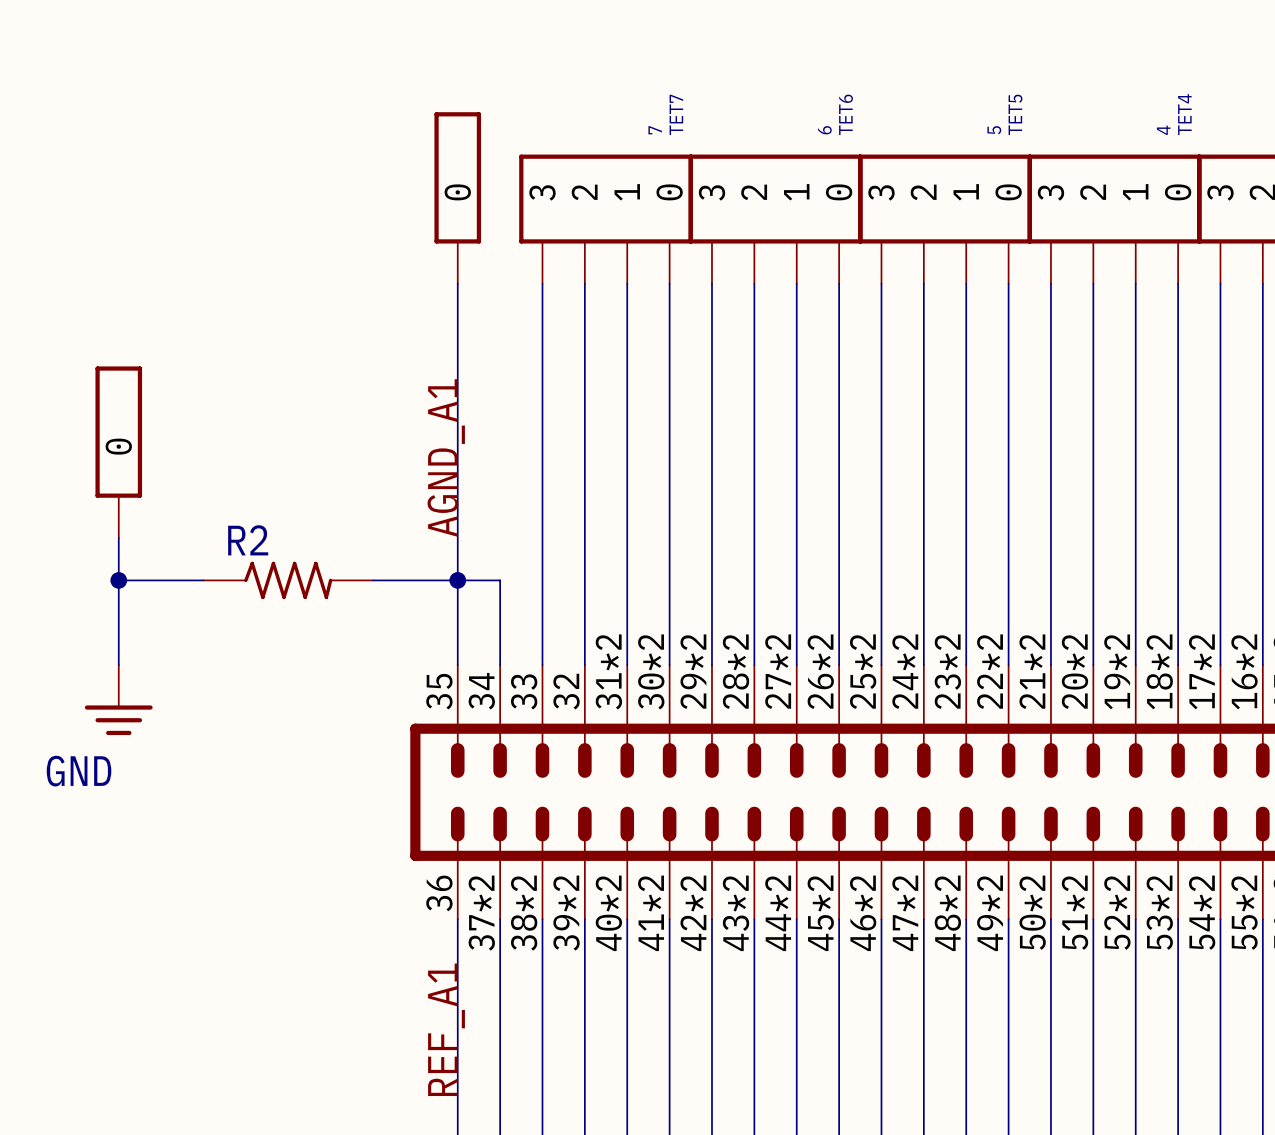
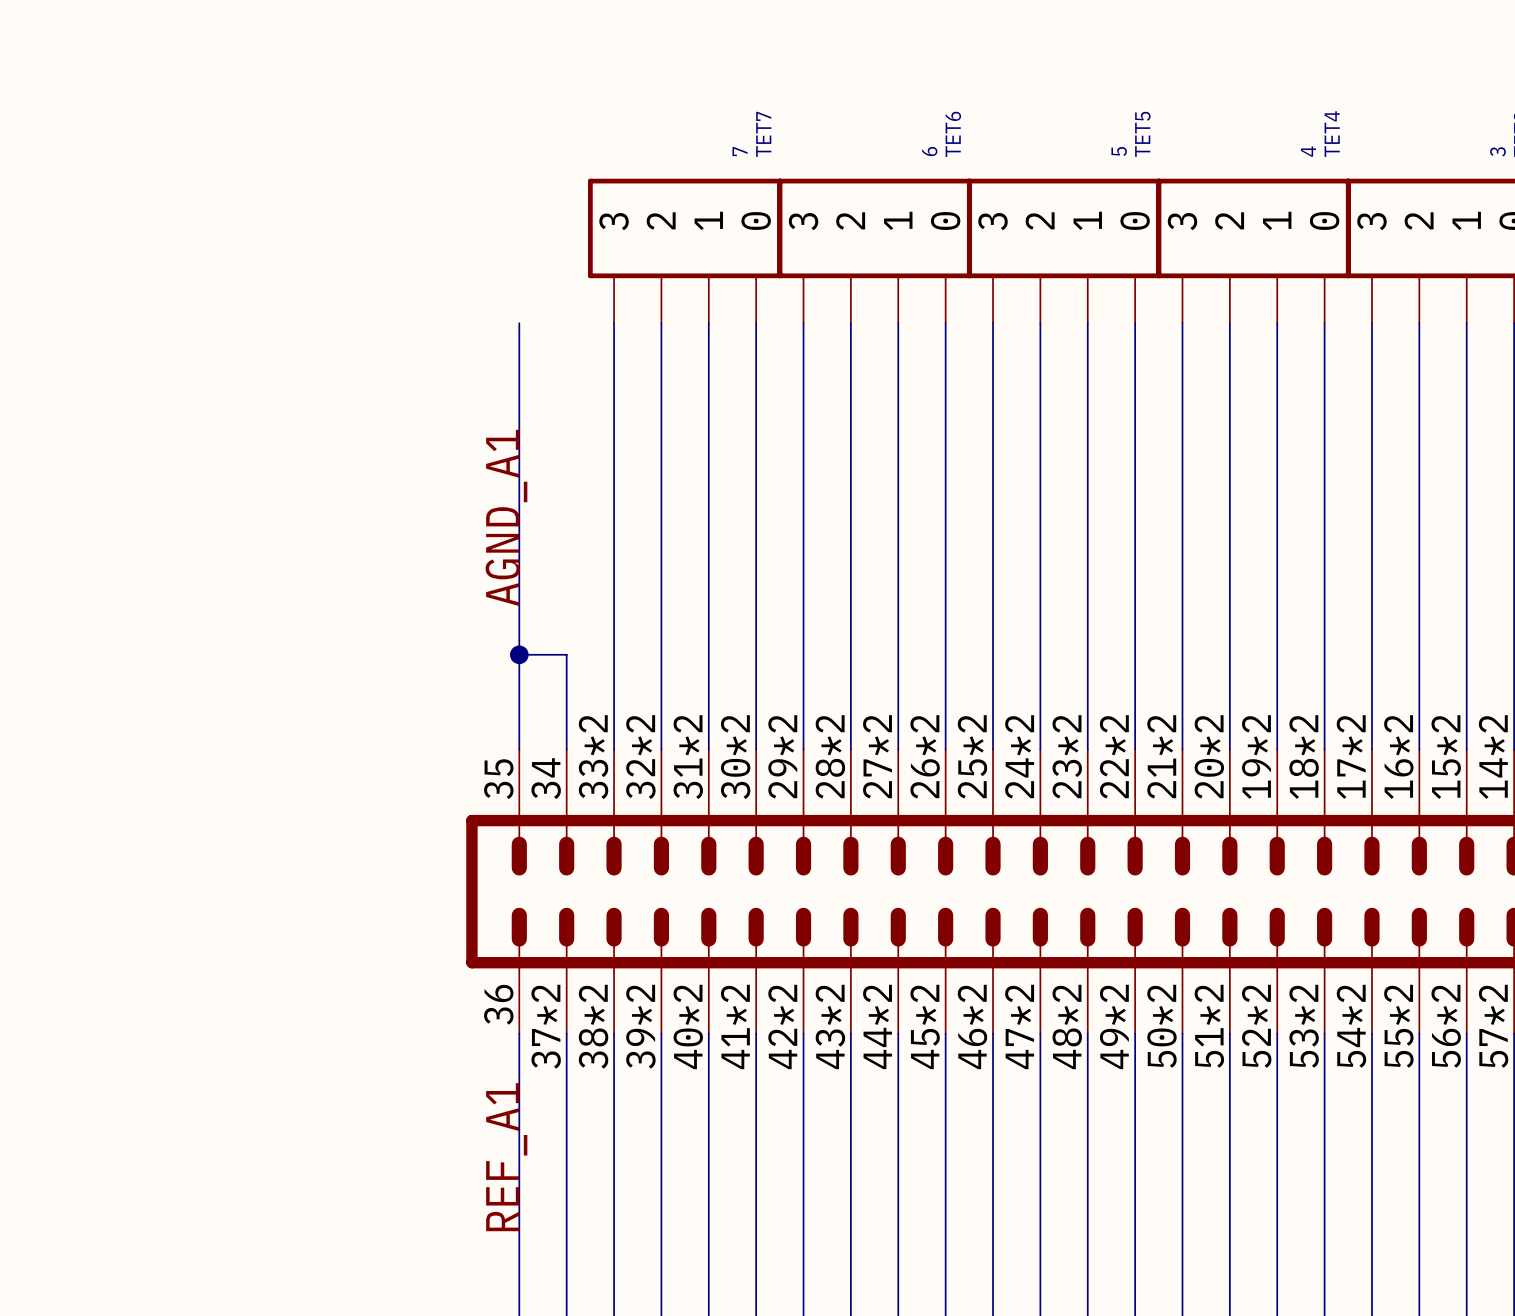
part: (457, 197) -> none
part: (118, 452) -> none
wire: (118, 538) (118, 665) -> none
wire: (118, 580) (203, 580) -> none
junction: (118, 580) -> none
R2: (288, 580) -> none
wire: (373, 580) (457, 580) -> none
part pin number: 33 (524, 691) -> 33*2 (593, 757)
part pin number: 32 (566, 691) -> 32*2 (640, 757)
power symbol: GND (118, 700) -> none

